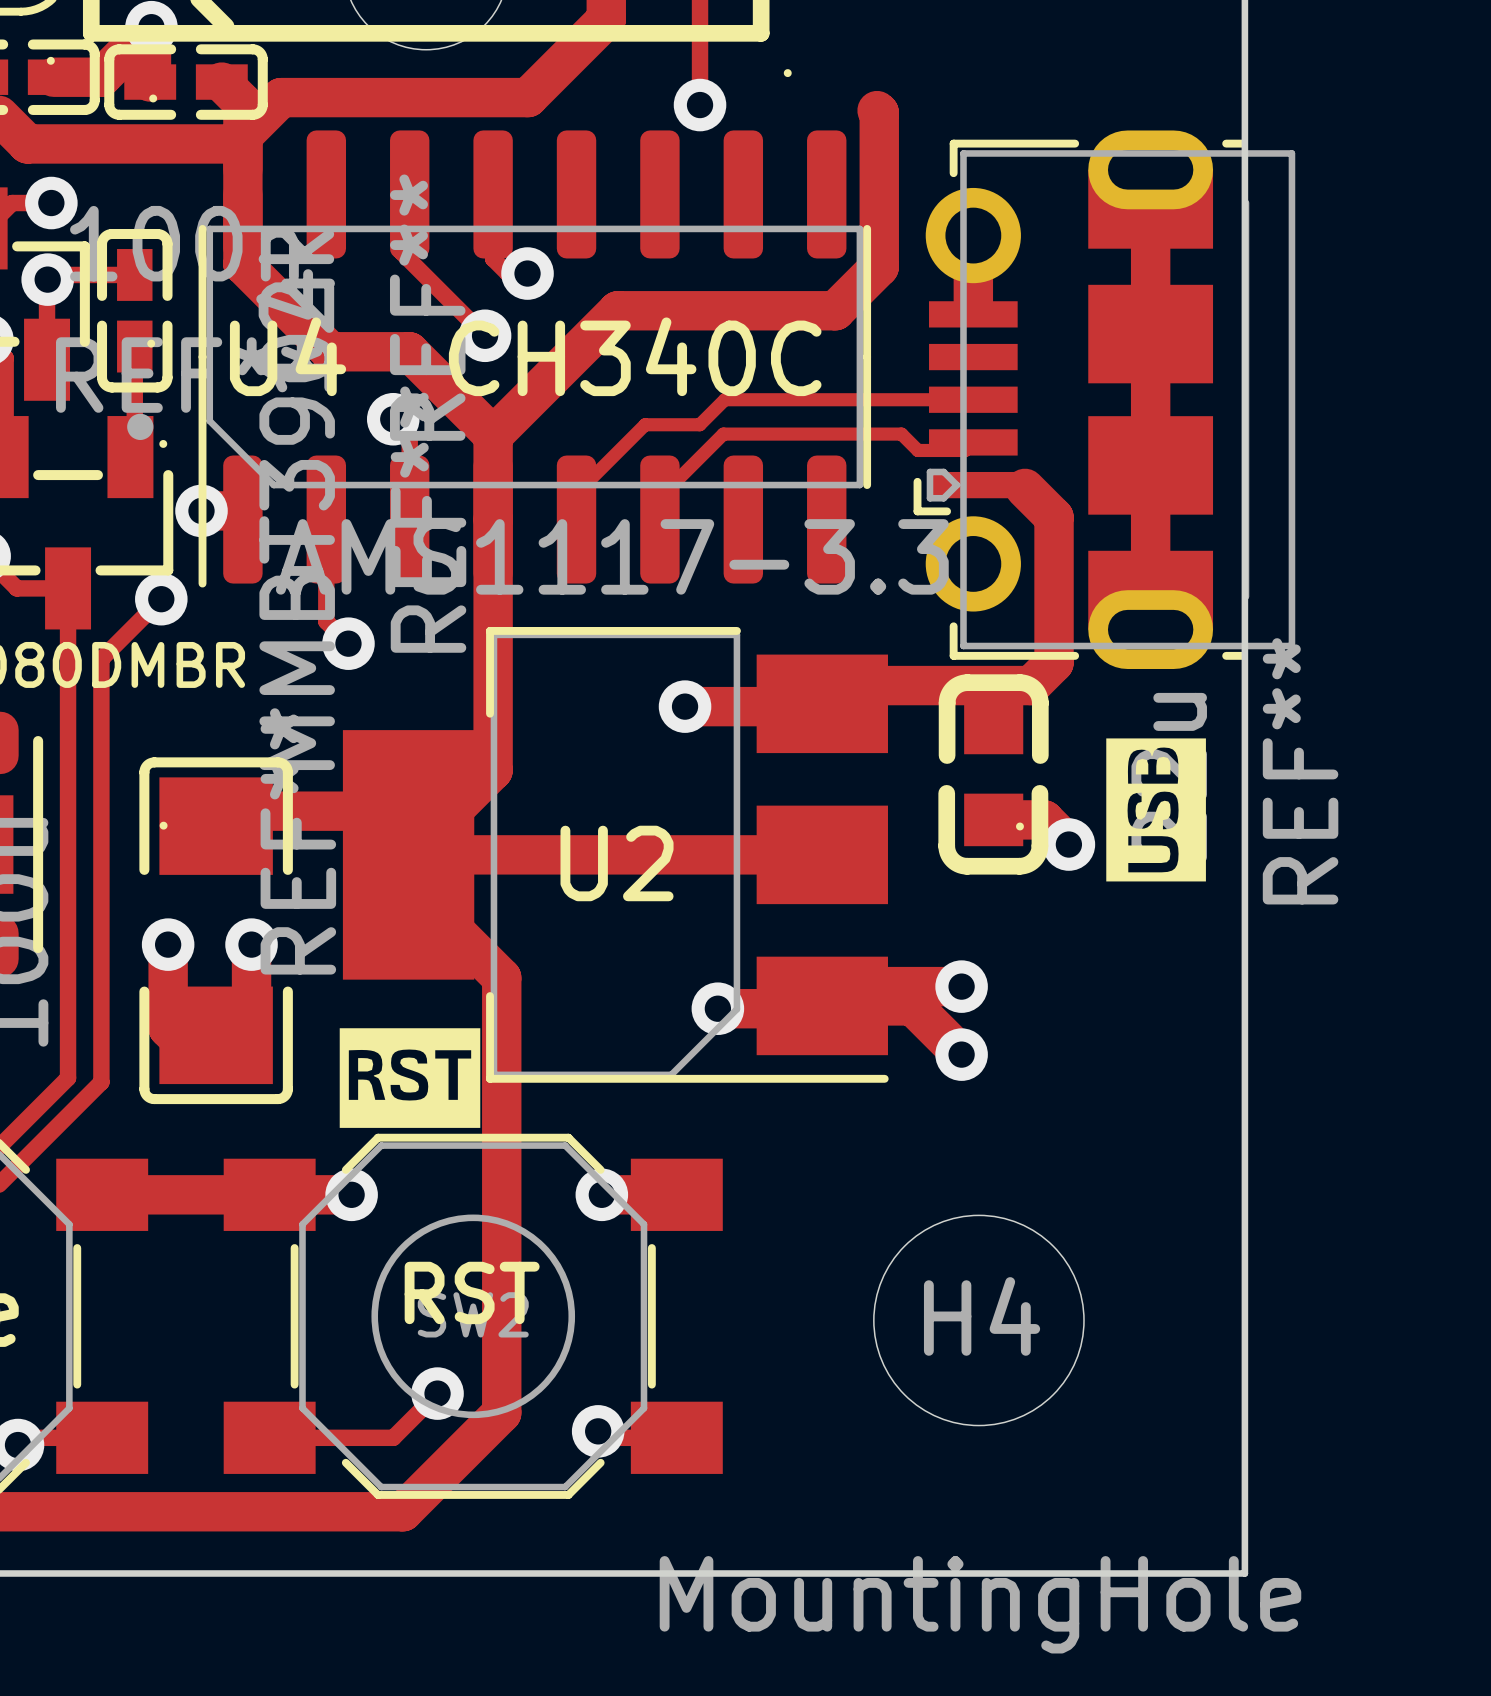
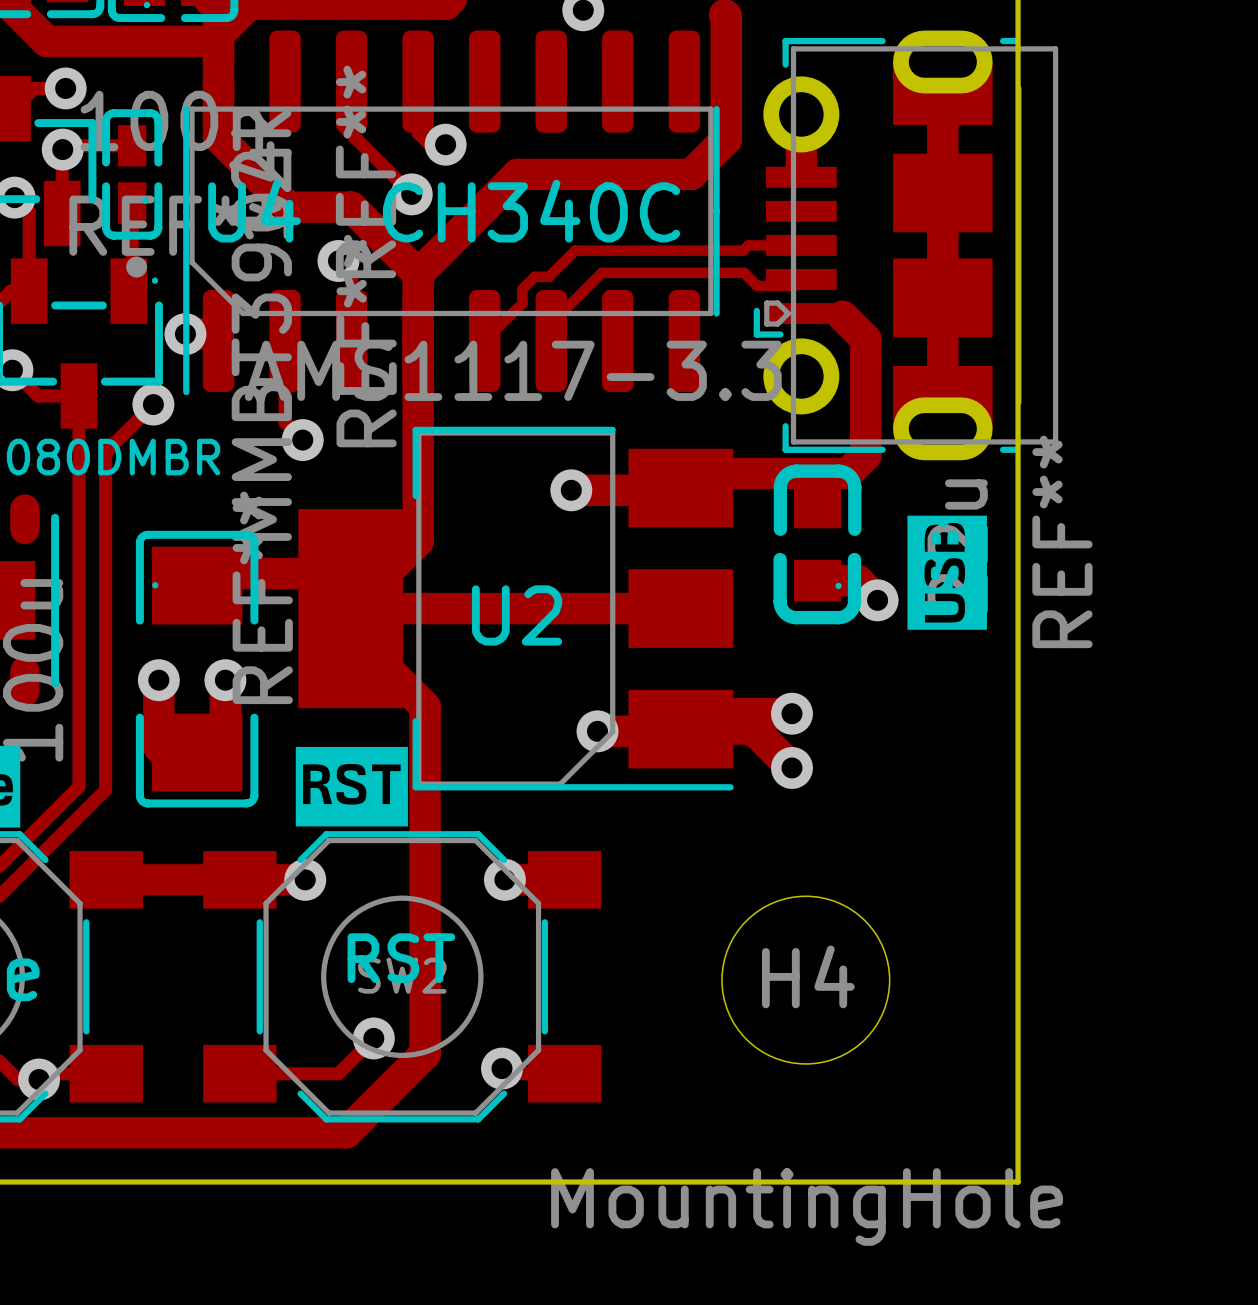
track: (906, 399) (724, 399) (699, 424) (645, 424) (576, 493) (576, 519) -> (748, 245) (743, 250) (575, 250) (548, 276) (534, 276) (522, 289) (522, 303) (484, 341)

